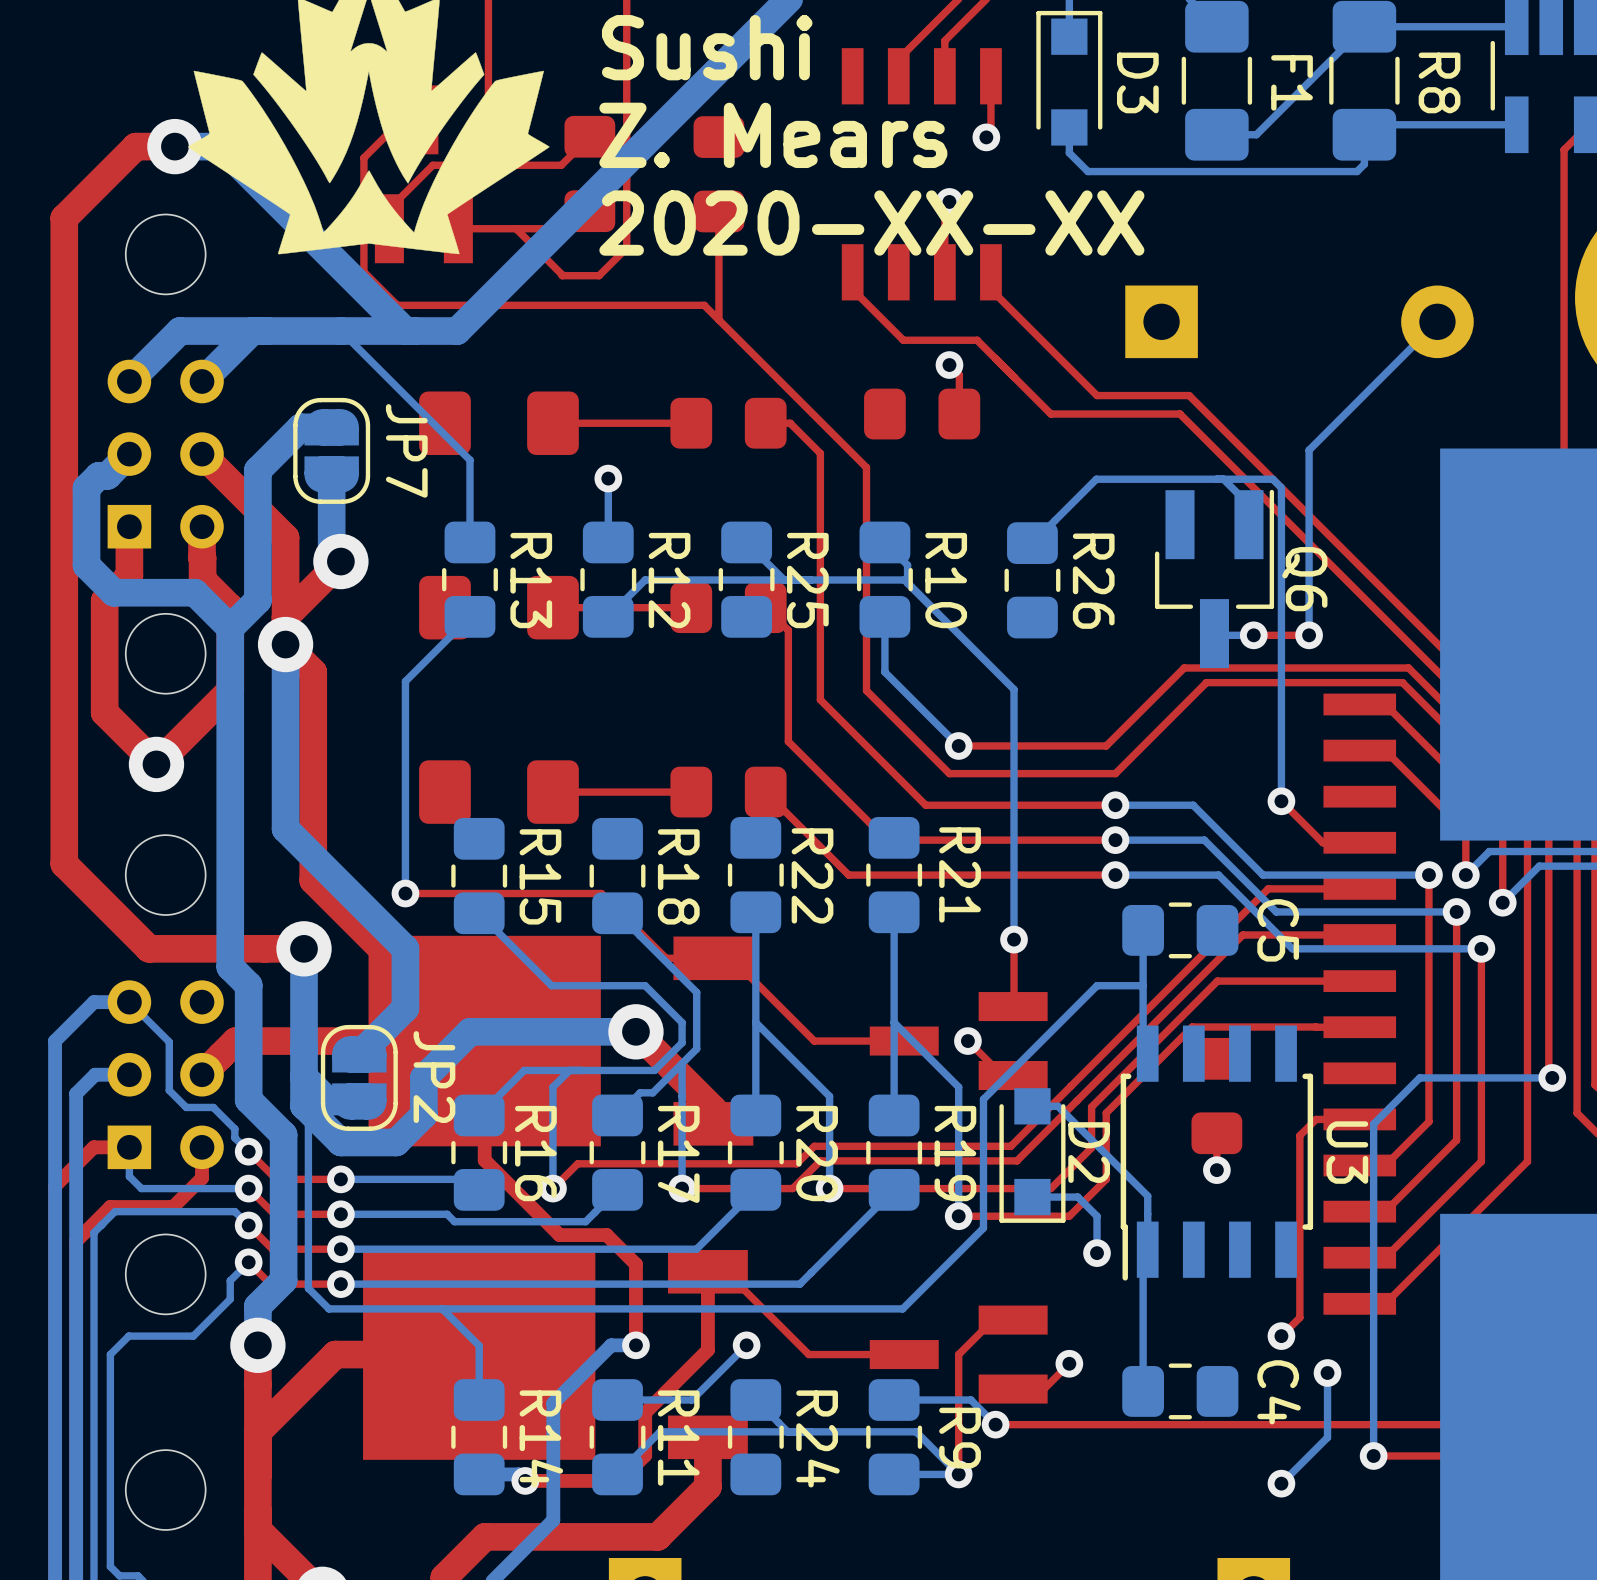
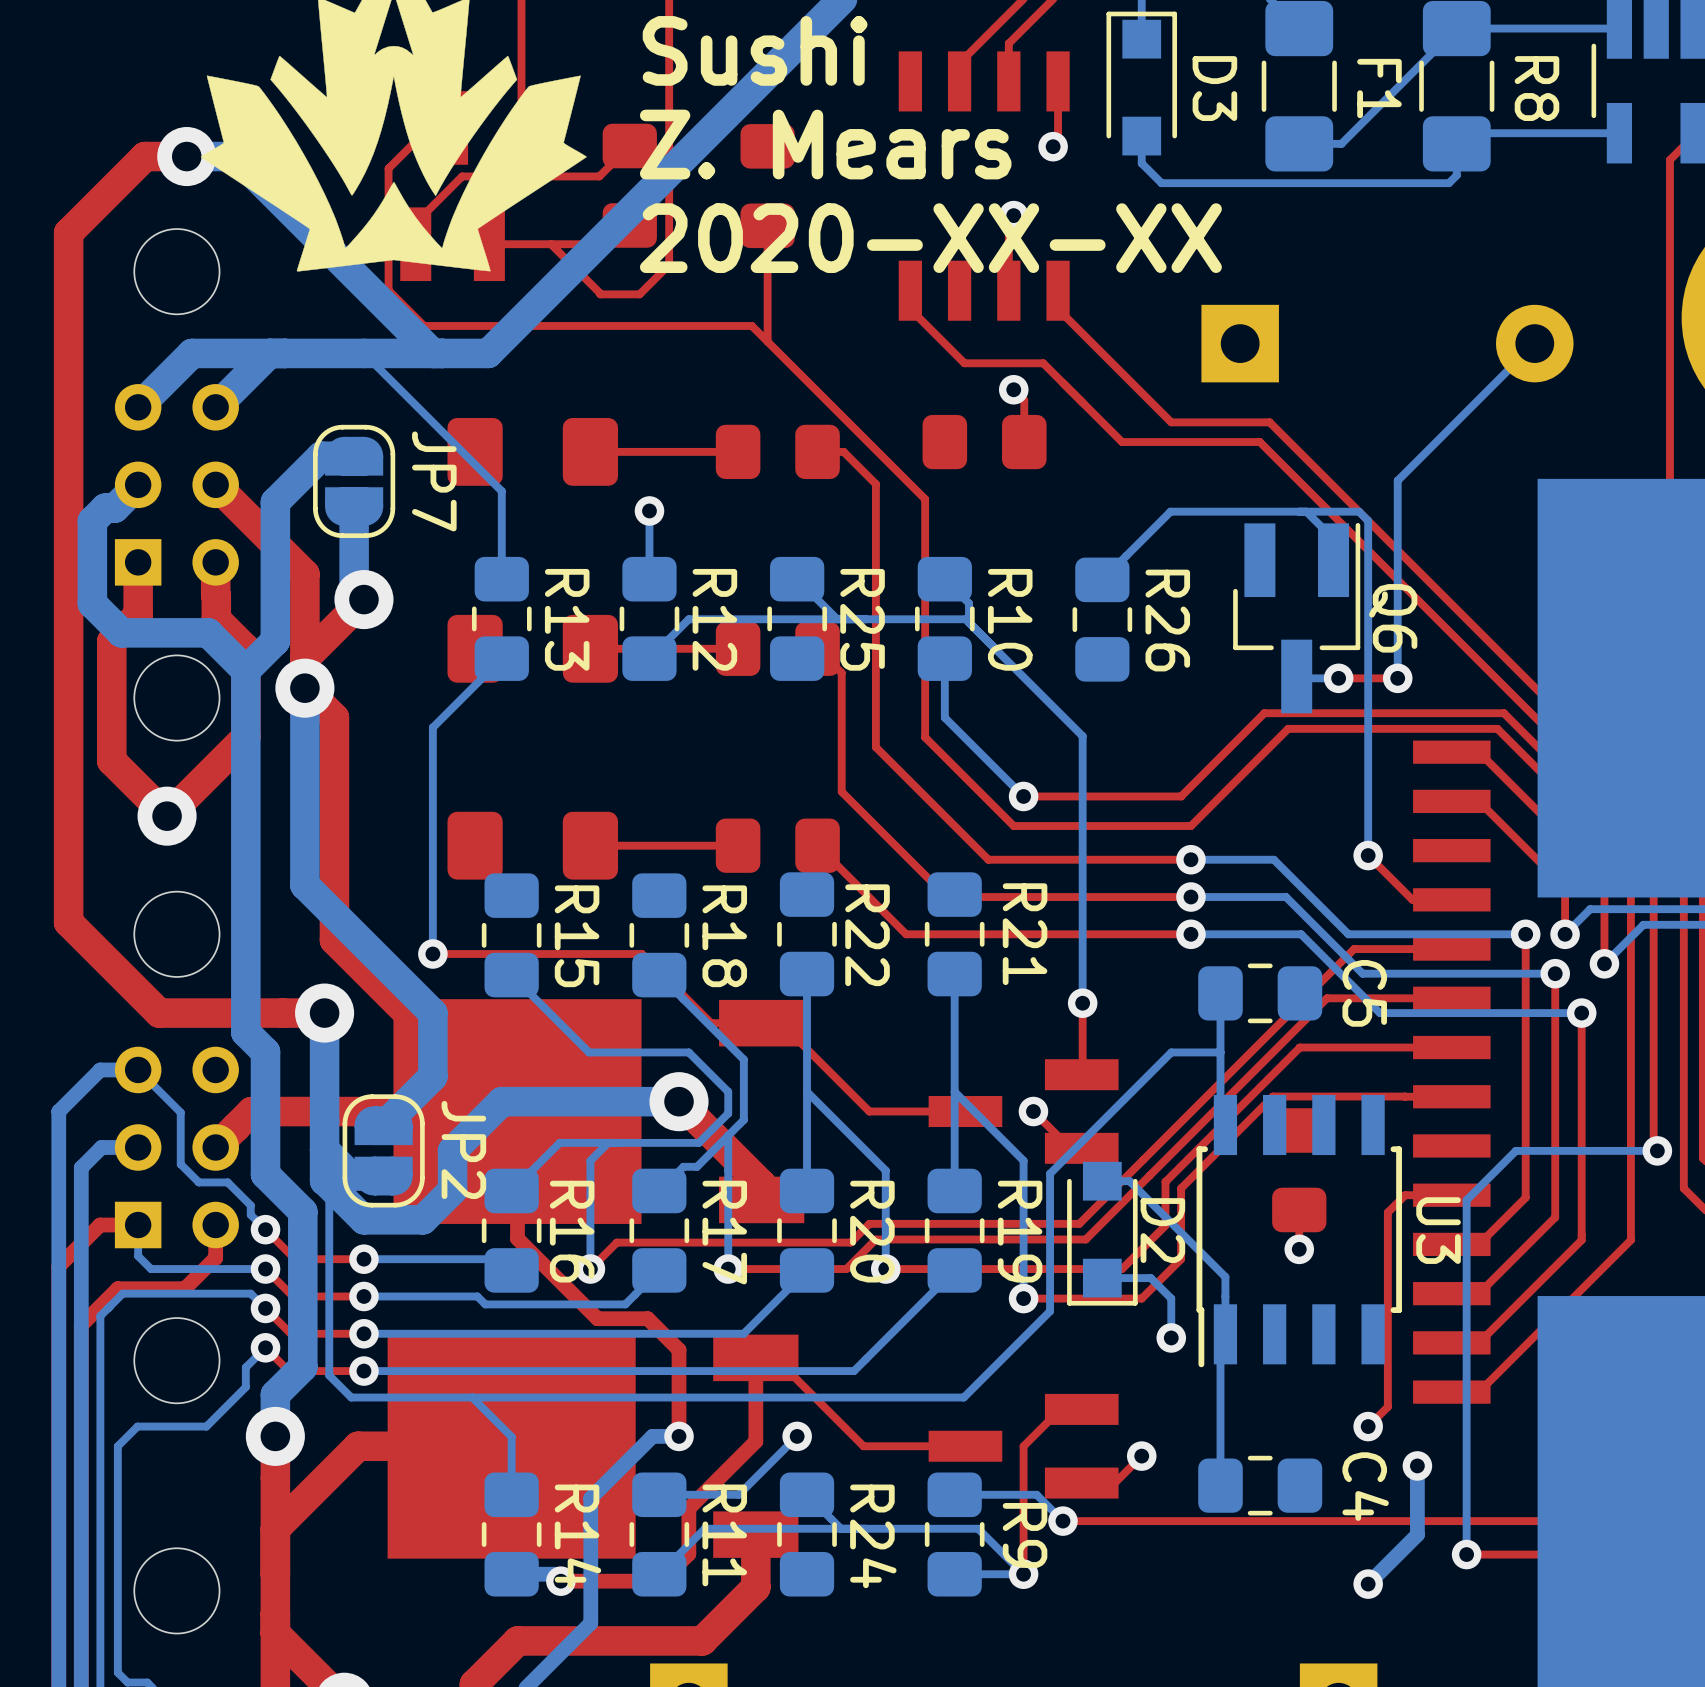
bottom track width: thin (1327, 1373) (1327, 1437) (1281, 1483) -> thick (1417, 1465) (1417, 1534) (1368, 1584)

